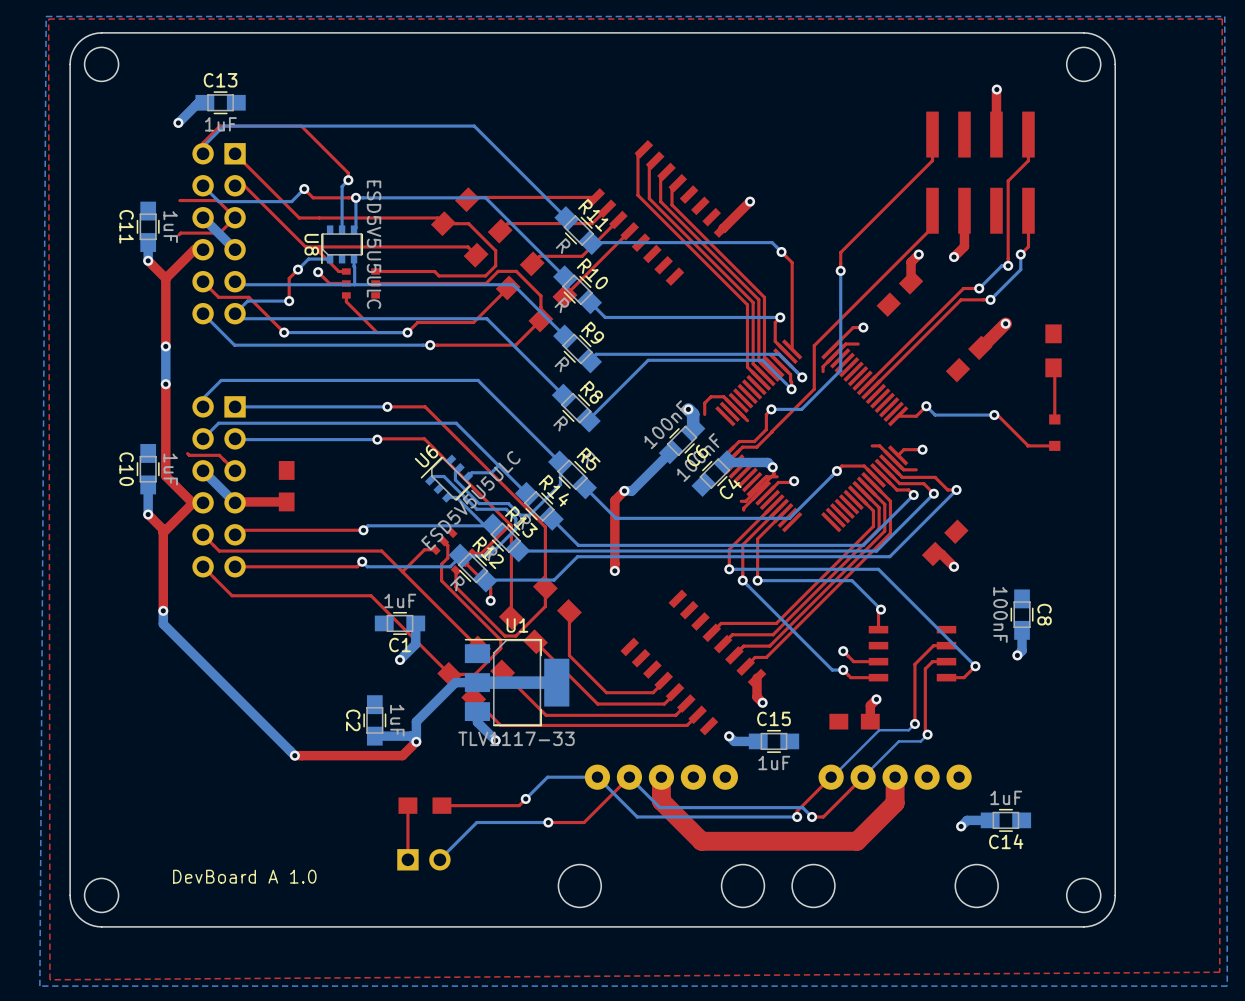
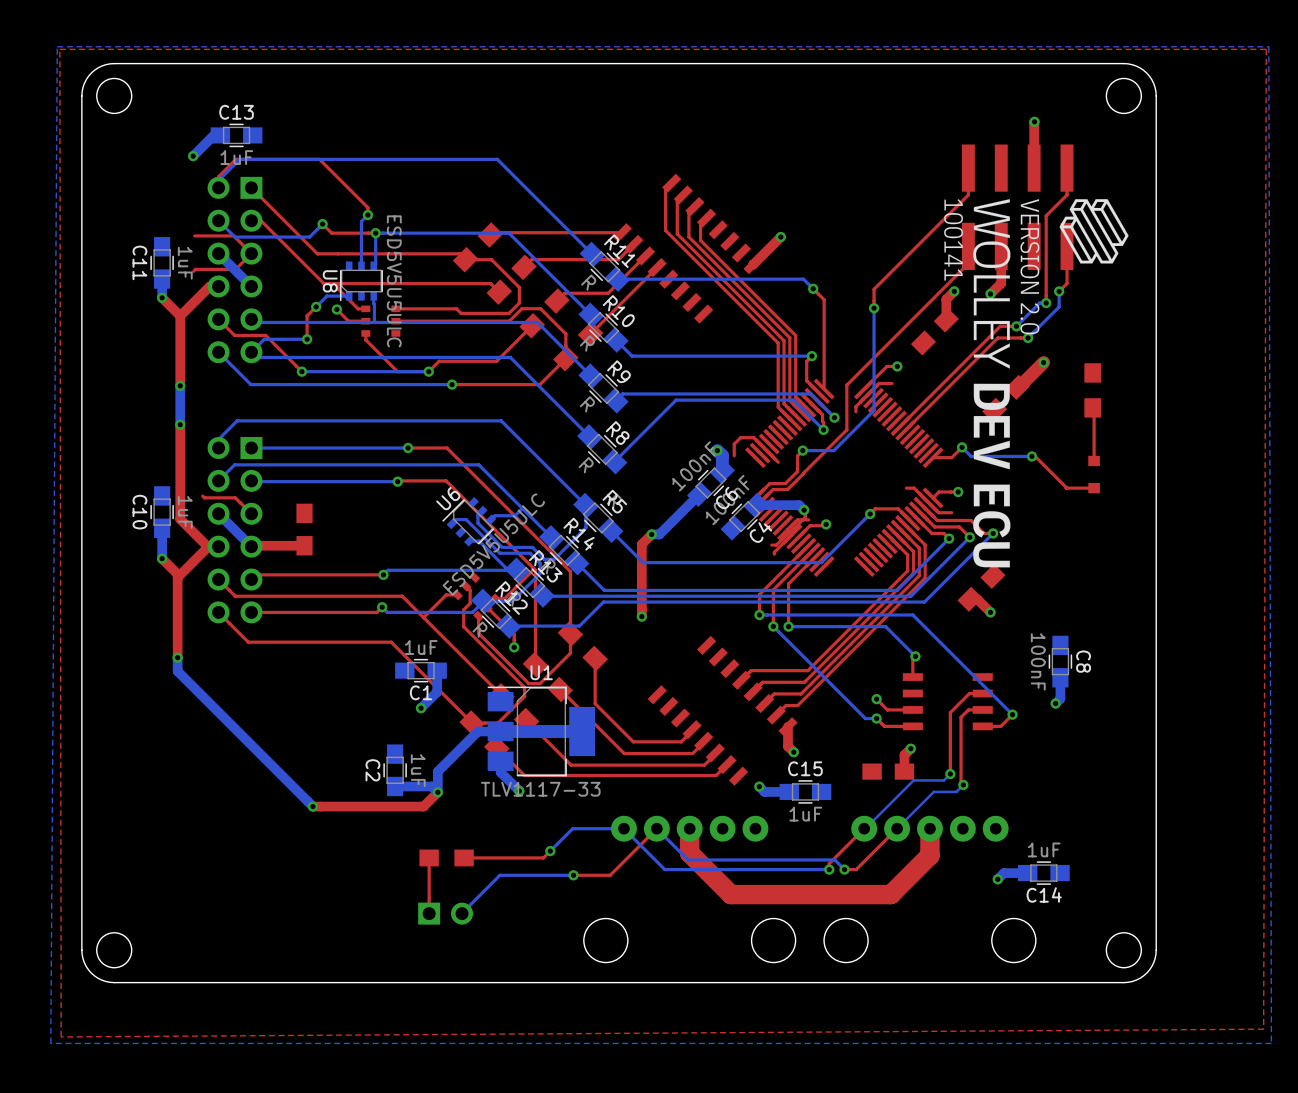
drawing: none -> [944, 199, 1129, 568]
text: DevBoard A 1.0 (244, 876) -> none

